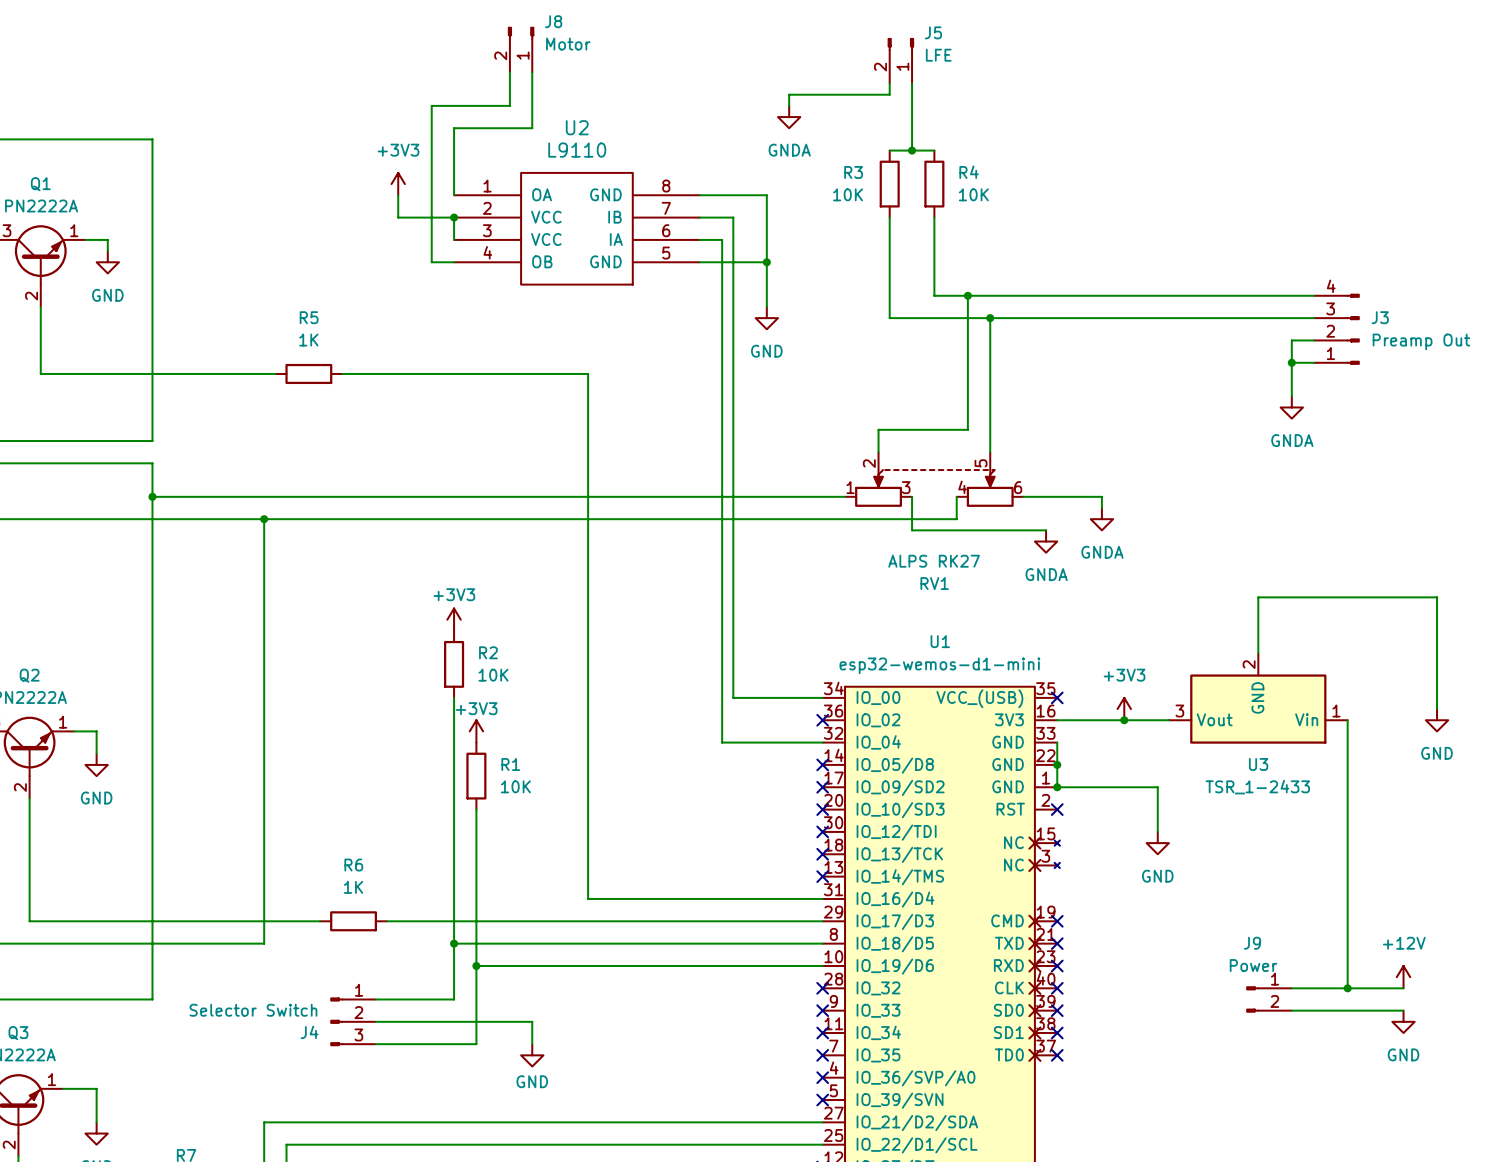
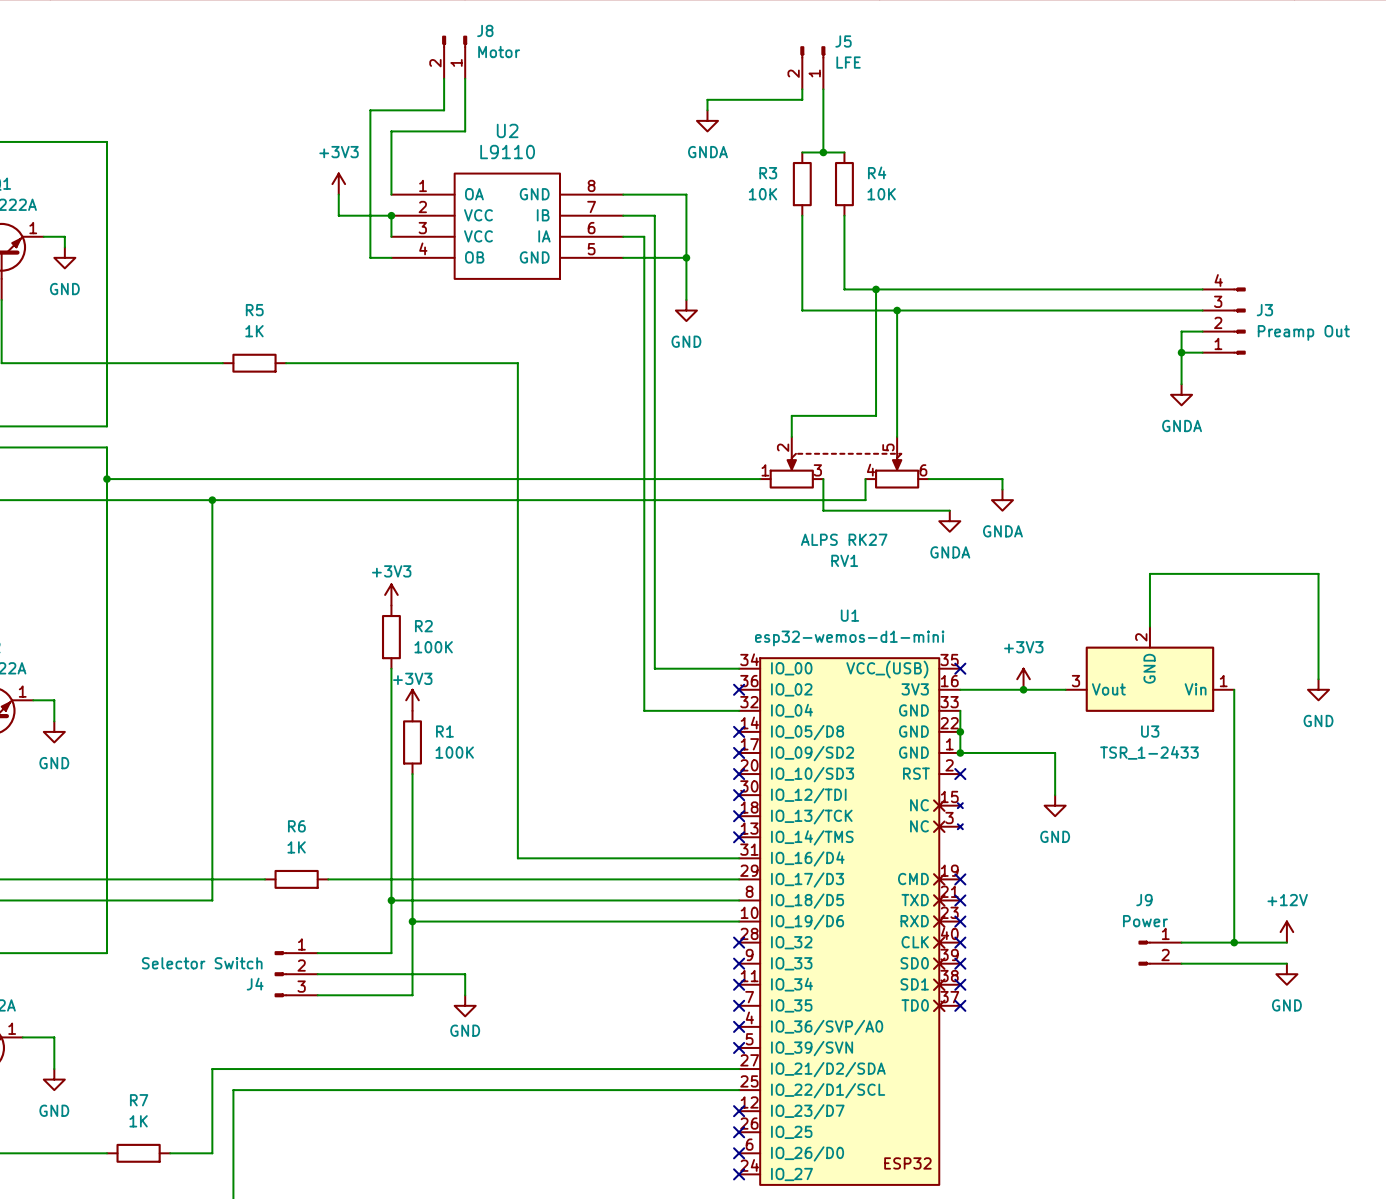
R2 value: 10K (493, 675) -> 100K (433, 647)
R1 value: 10K (515, 786) -> 100K (454, 752)

